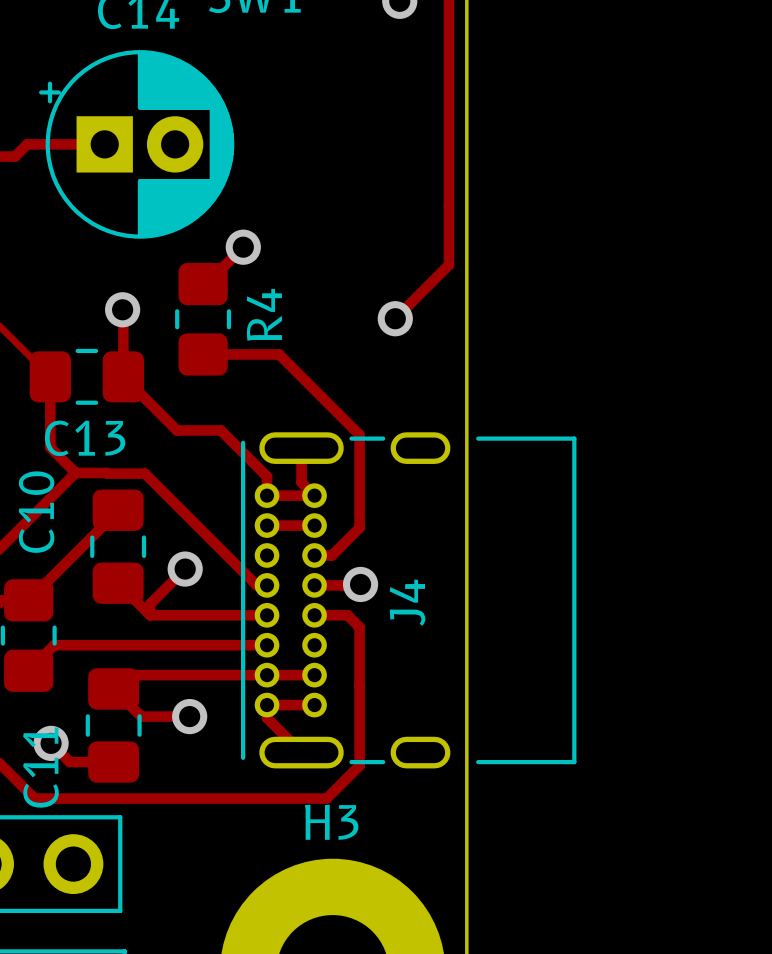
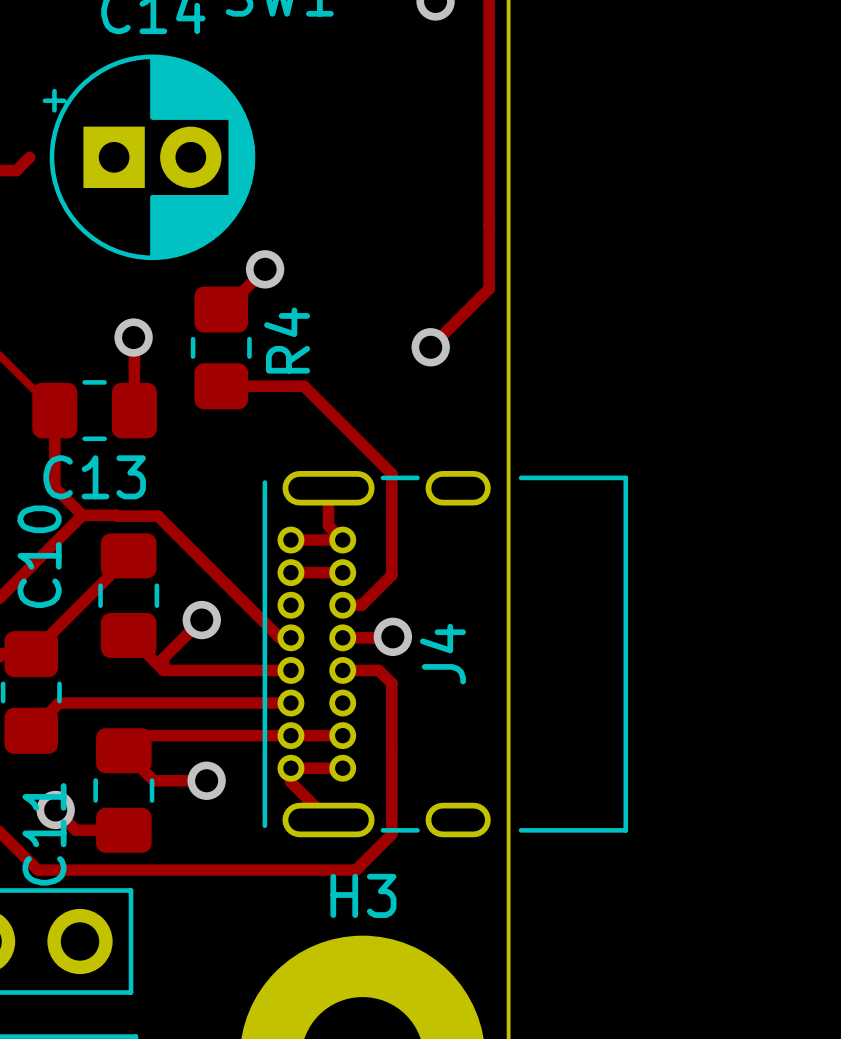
track: (27, 144) (104, 144) -> none
track: (123, 376) (177, 430) (220, 430) (267, 476) (267, 495) -> none

